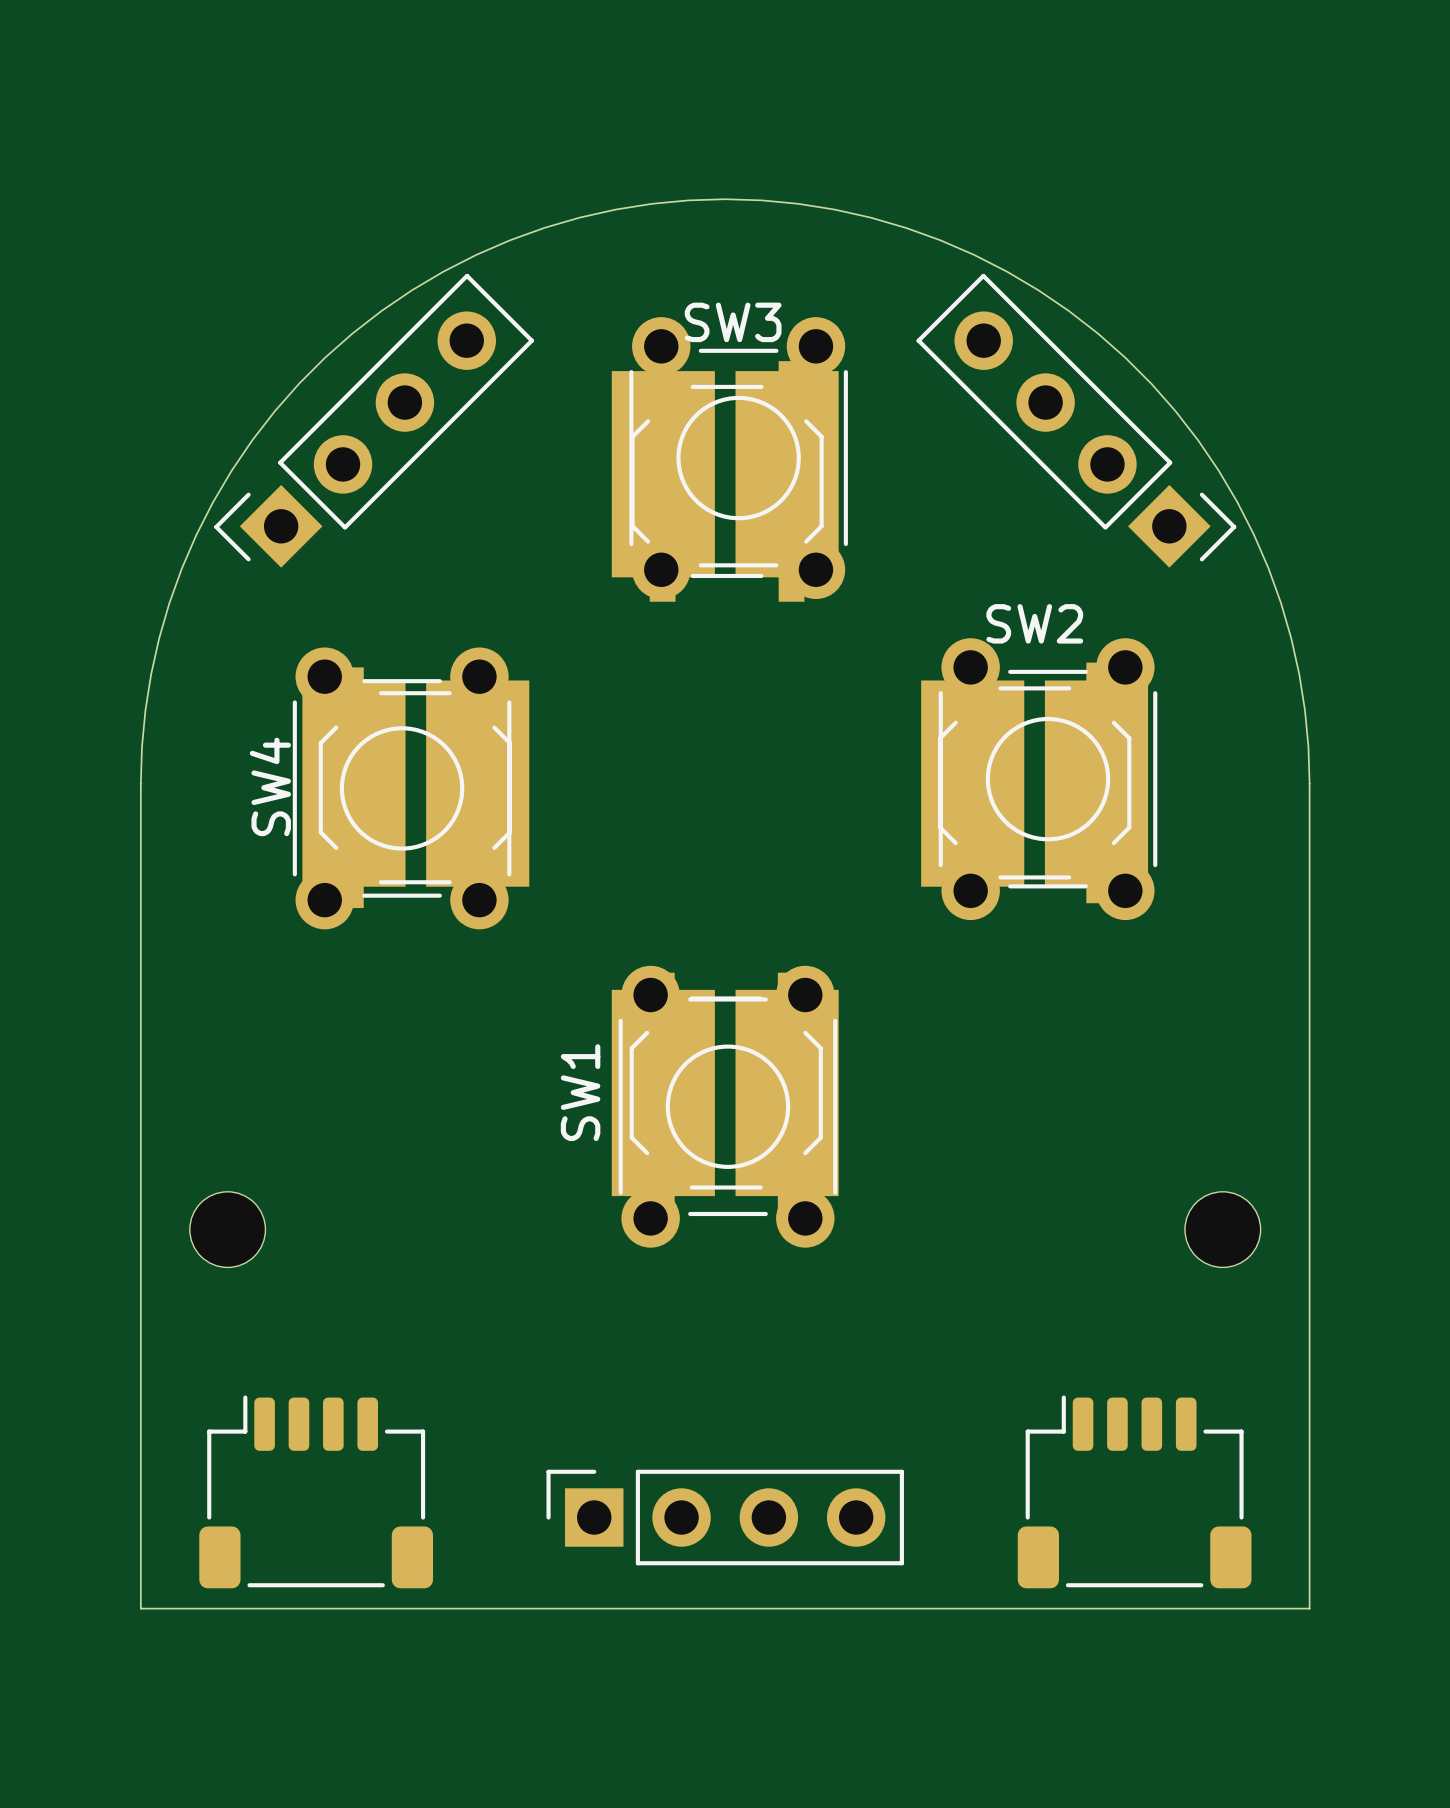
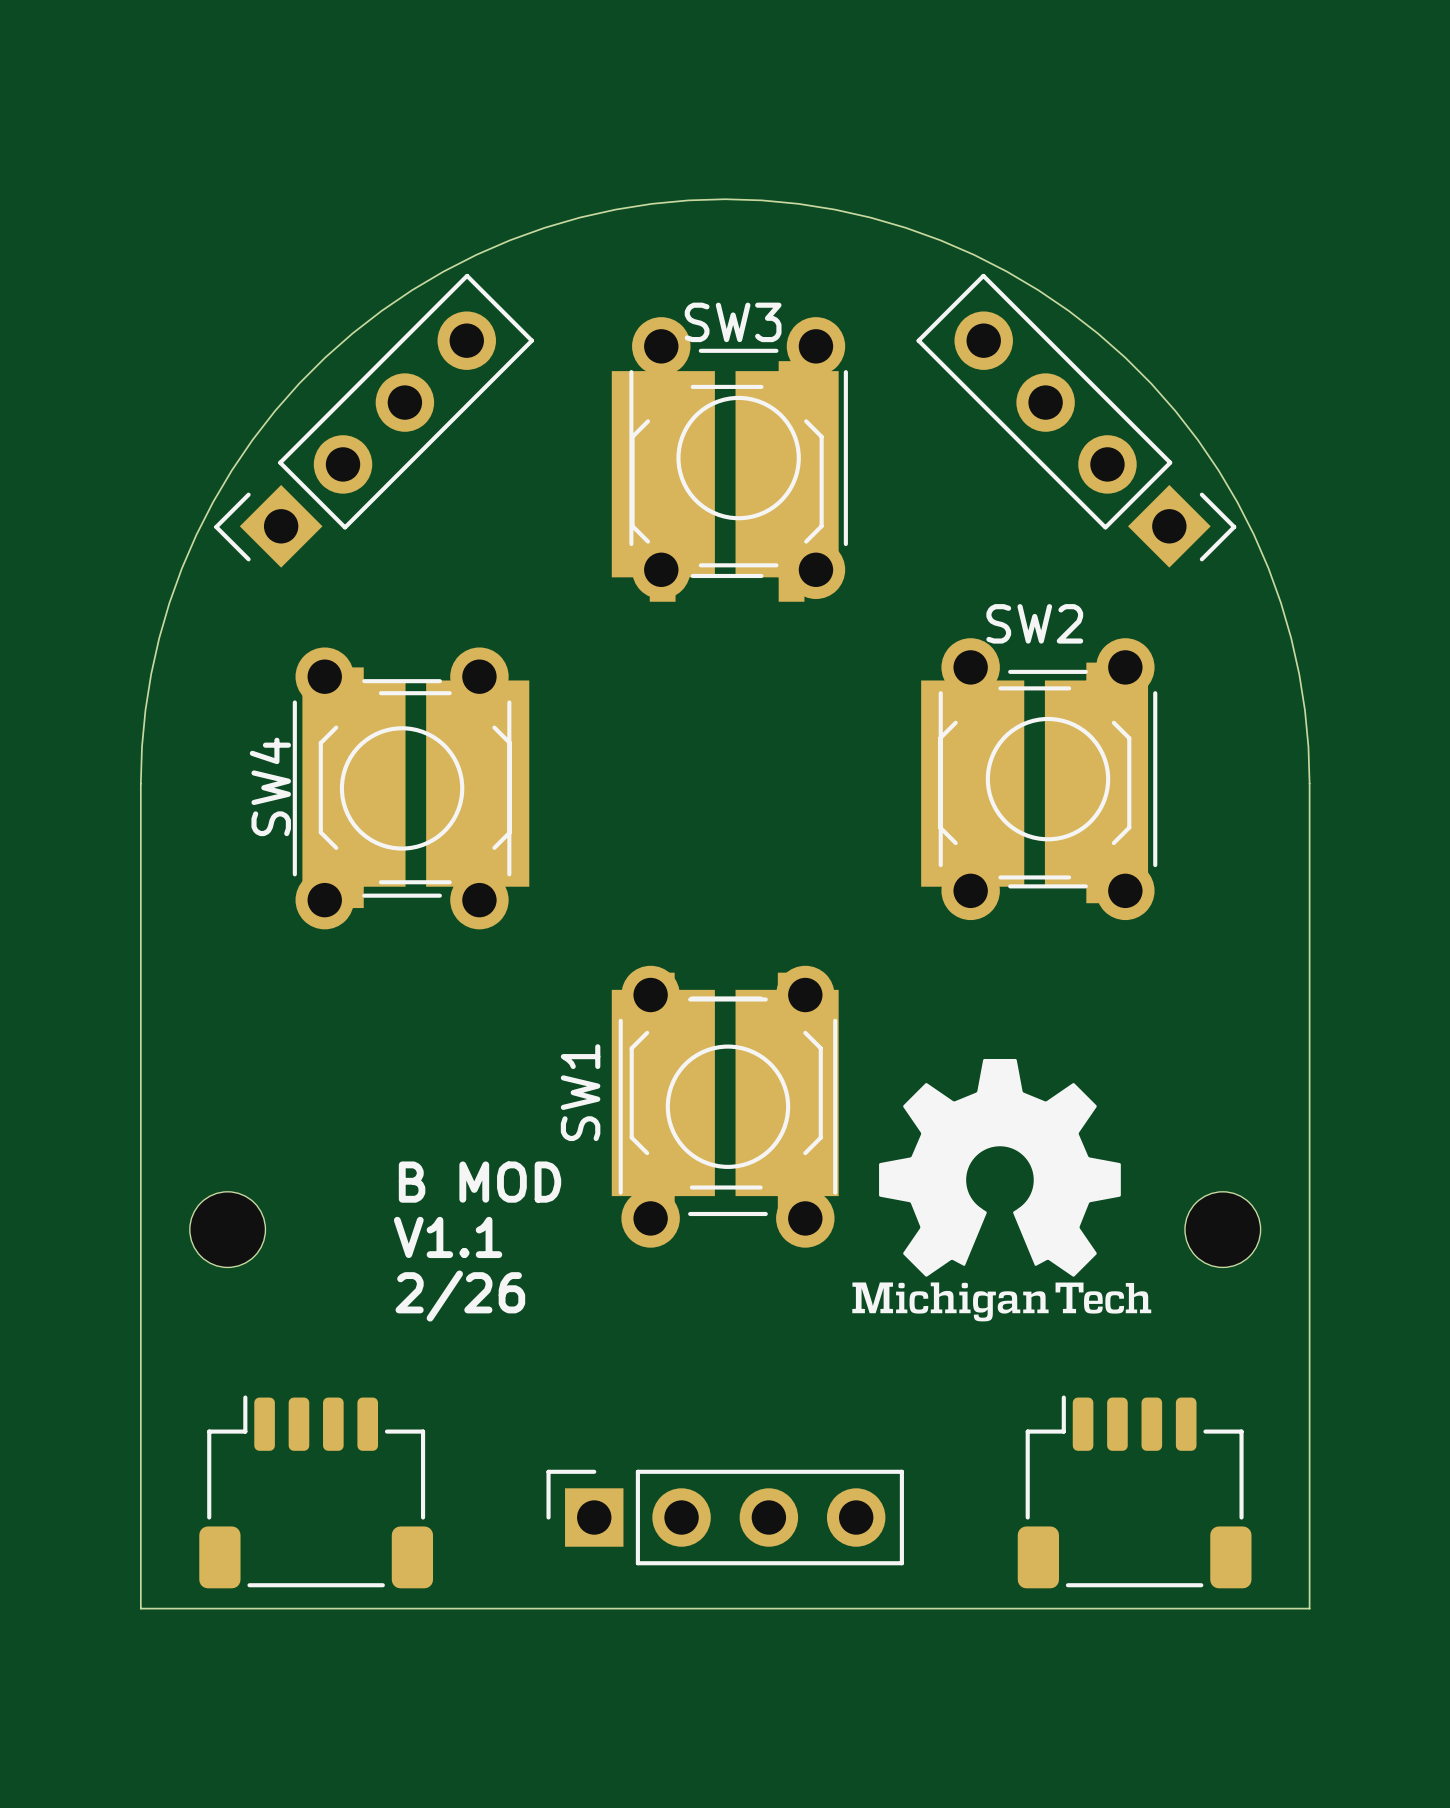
drawing: none -> [852, 1058, 1152, 1322]
text: none -> B MOD (480, 1182)
text: none -> V1.1 (448, 1237)
text: none -> 2/26 (460, 1296)

